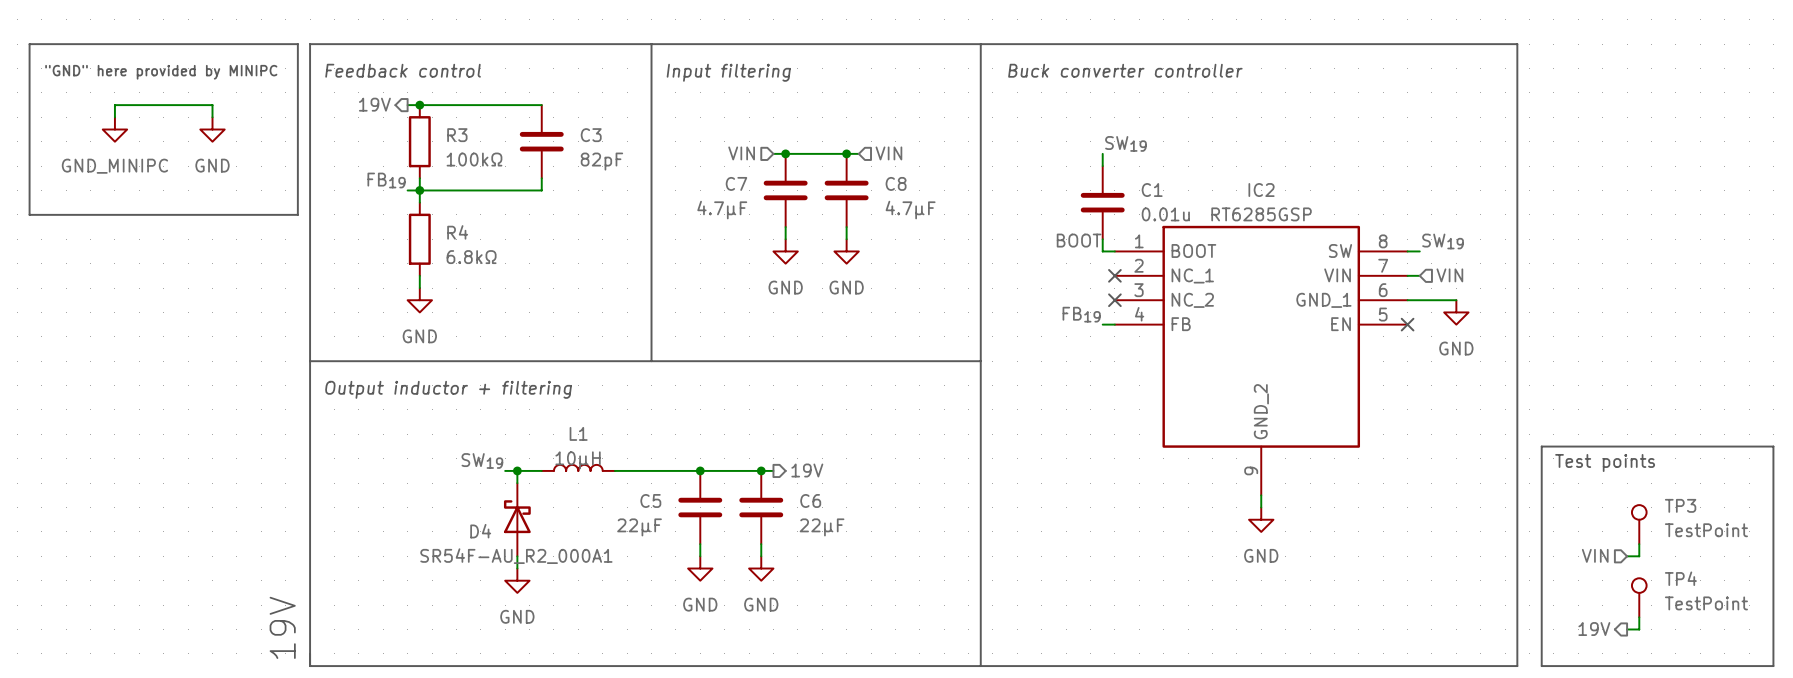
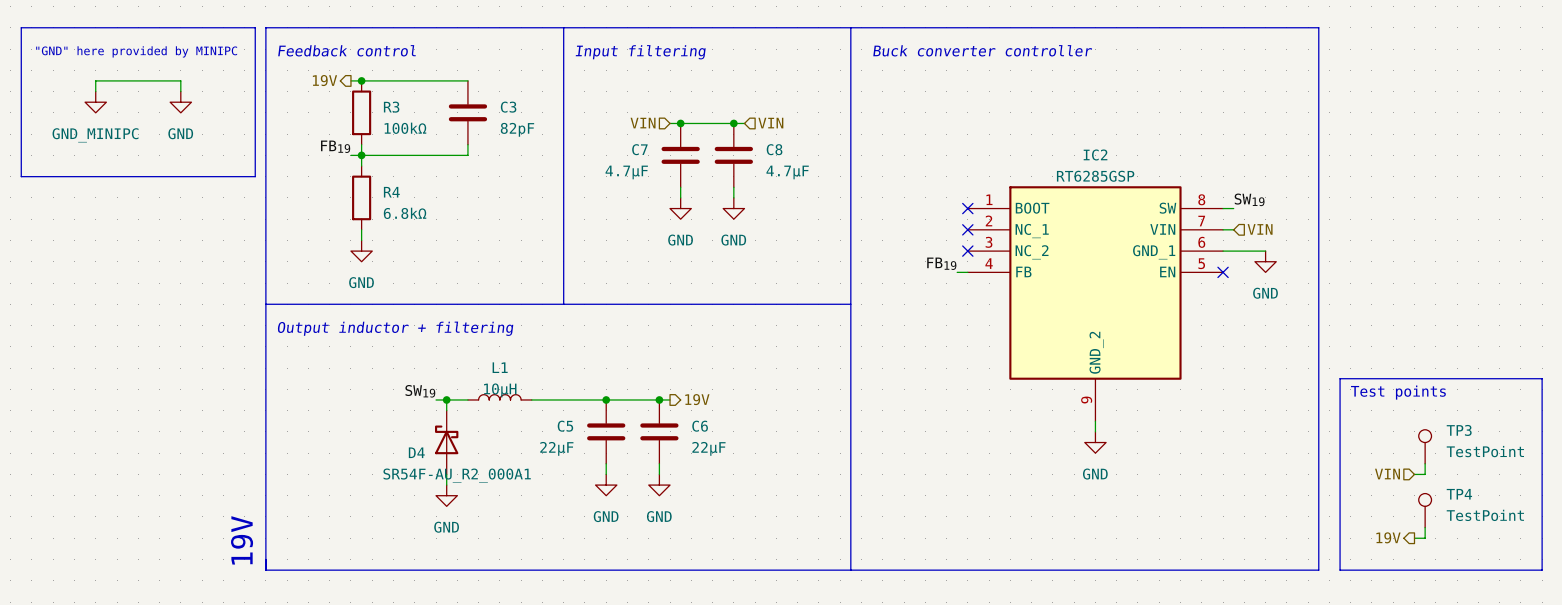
label: SW19 (1125, 143) -> none
wire: (1102, 153) (1102, 166) -> none
C1: 0.01u (1102, 202) -> none
wire: (1102, 239) (1102, 251) (1114, 251) -> none
label: BOOT (1079, 240) -> none
no-connect mark: none -> (967, 208)

